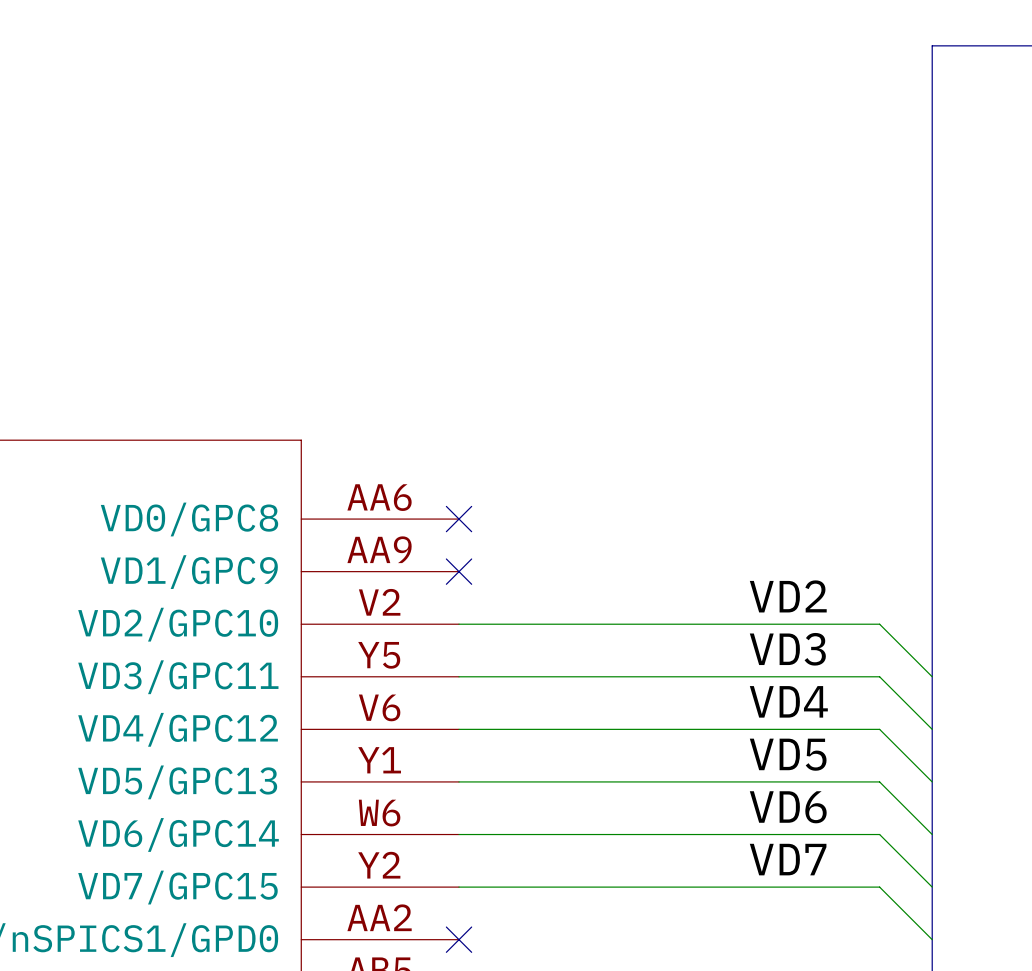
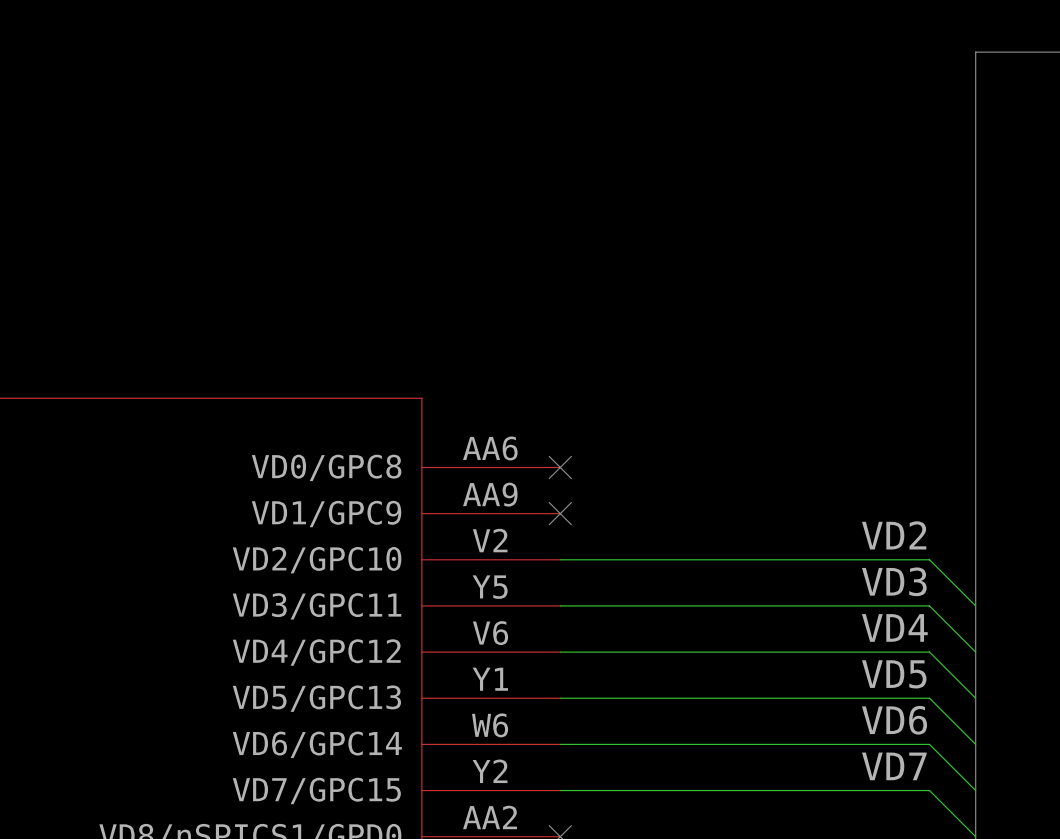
label position: VD2 (788, 596) -> VD2 (894, 535)
label position: VD3 (787, 649) -> VD3 (894, 581)
label position: VD4 (788, 701) -> VD4 (894, 627)
label position: VD5 (788, 754) -> VD5 (894, 674)
label position: VD6 (788, 807) -> VD6 (894, 720)
label position: VD7 (788, 859) -> VD7 (894, 766)

